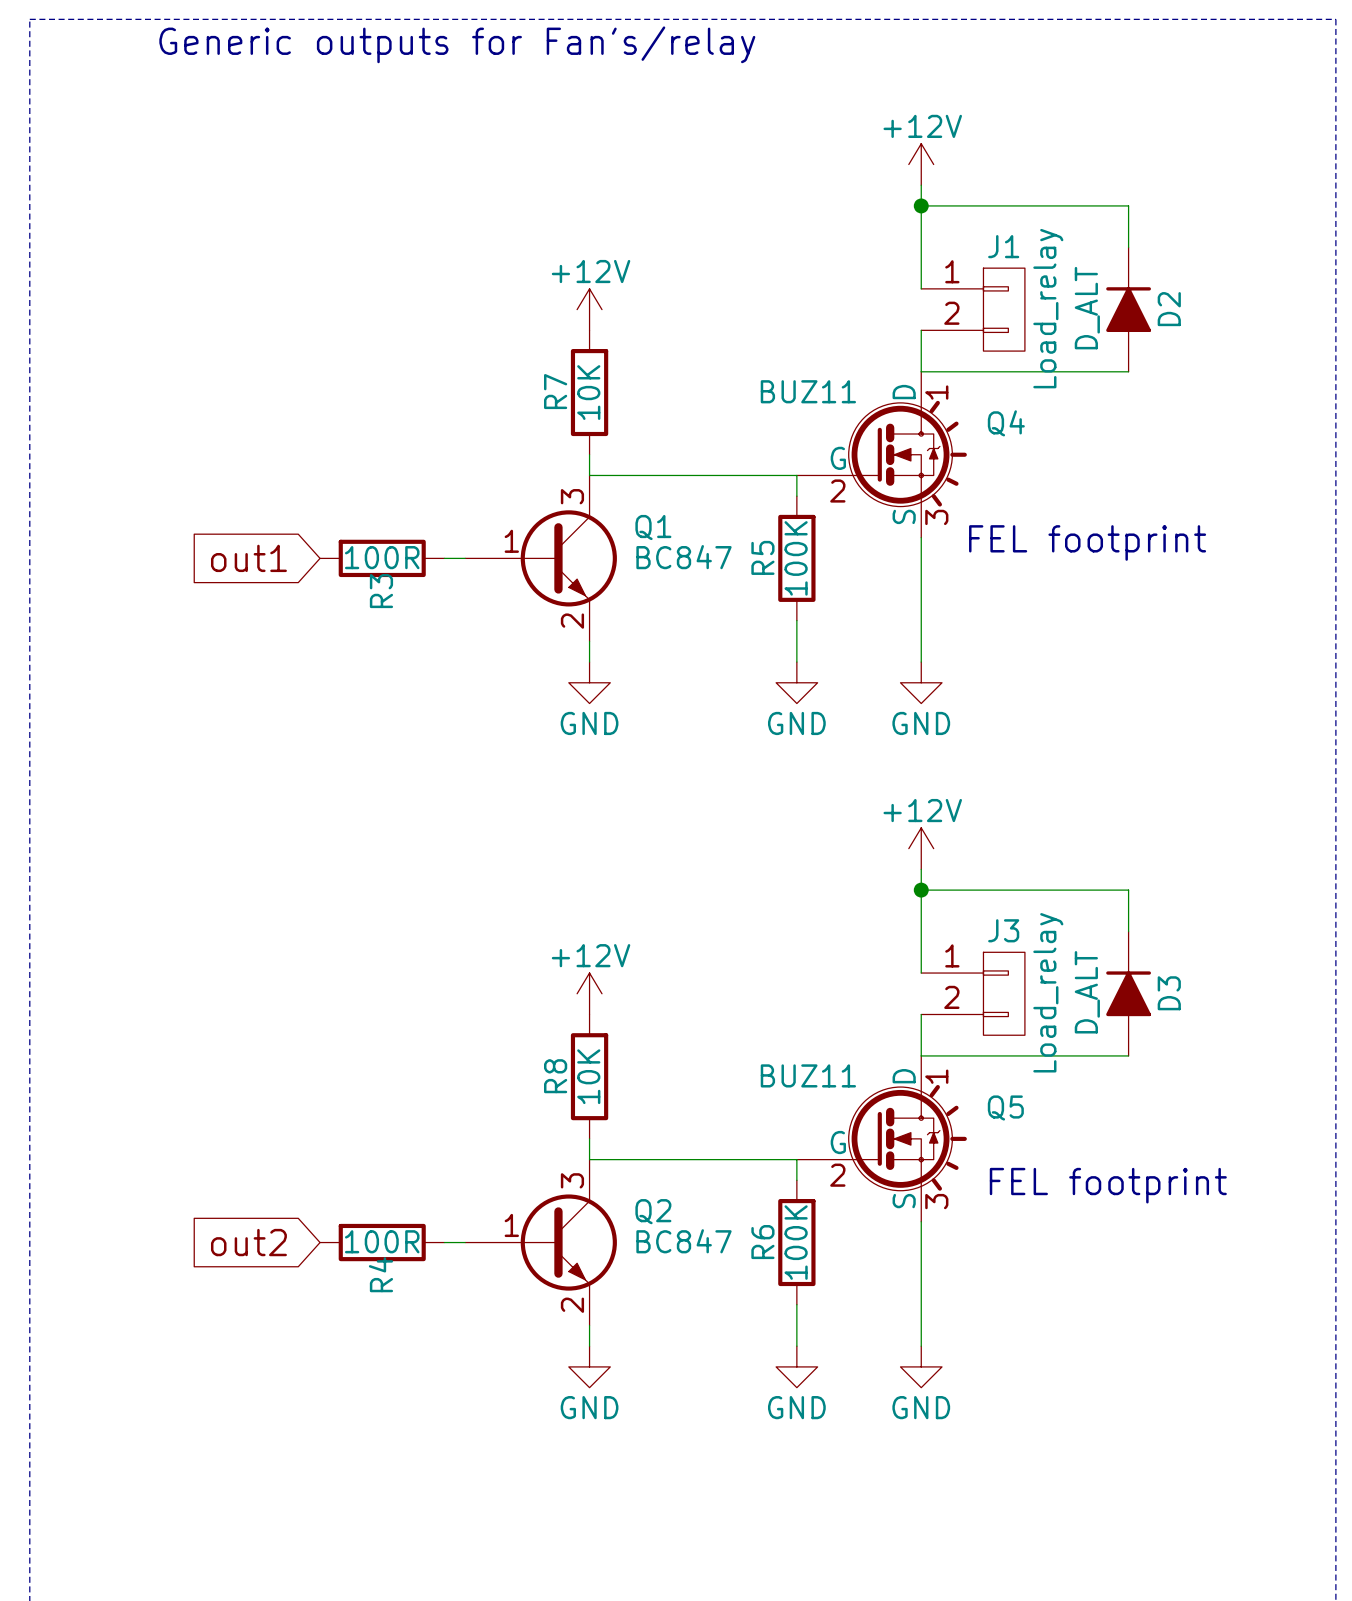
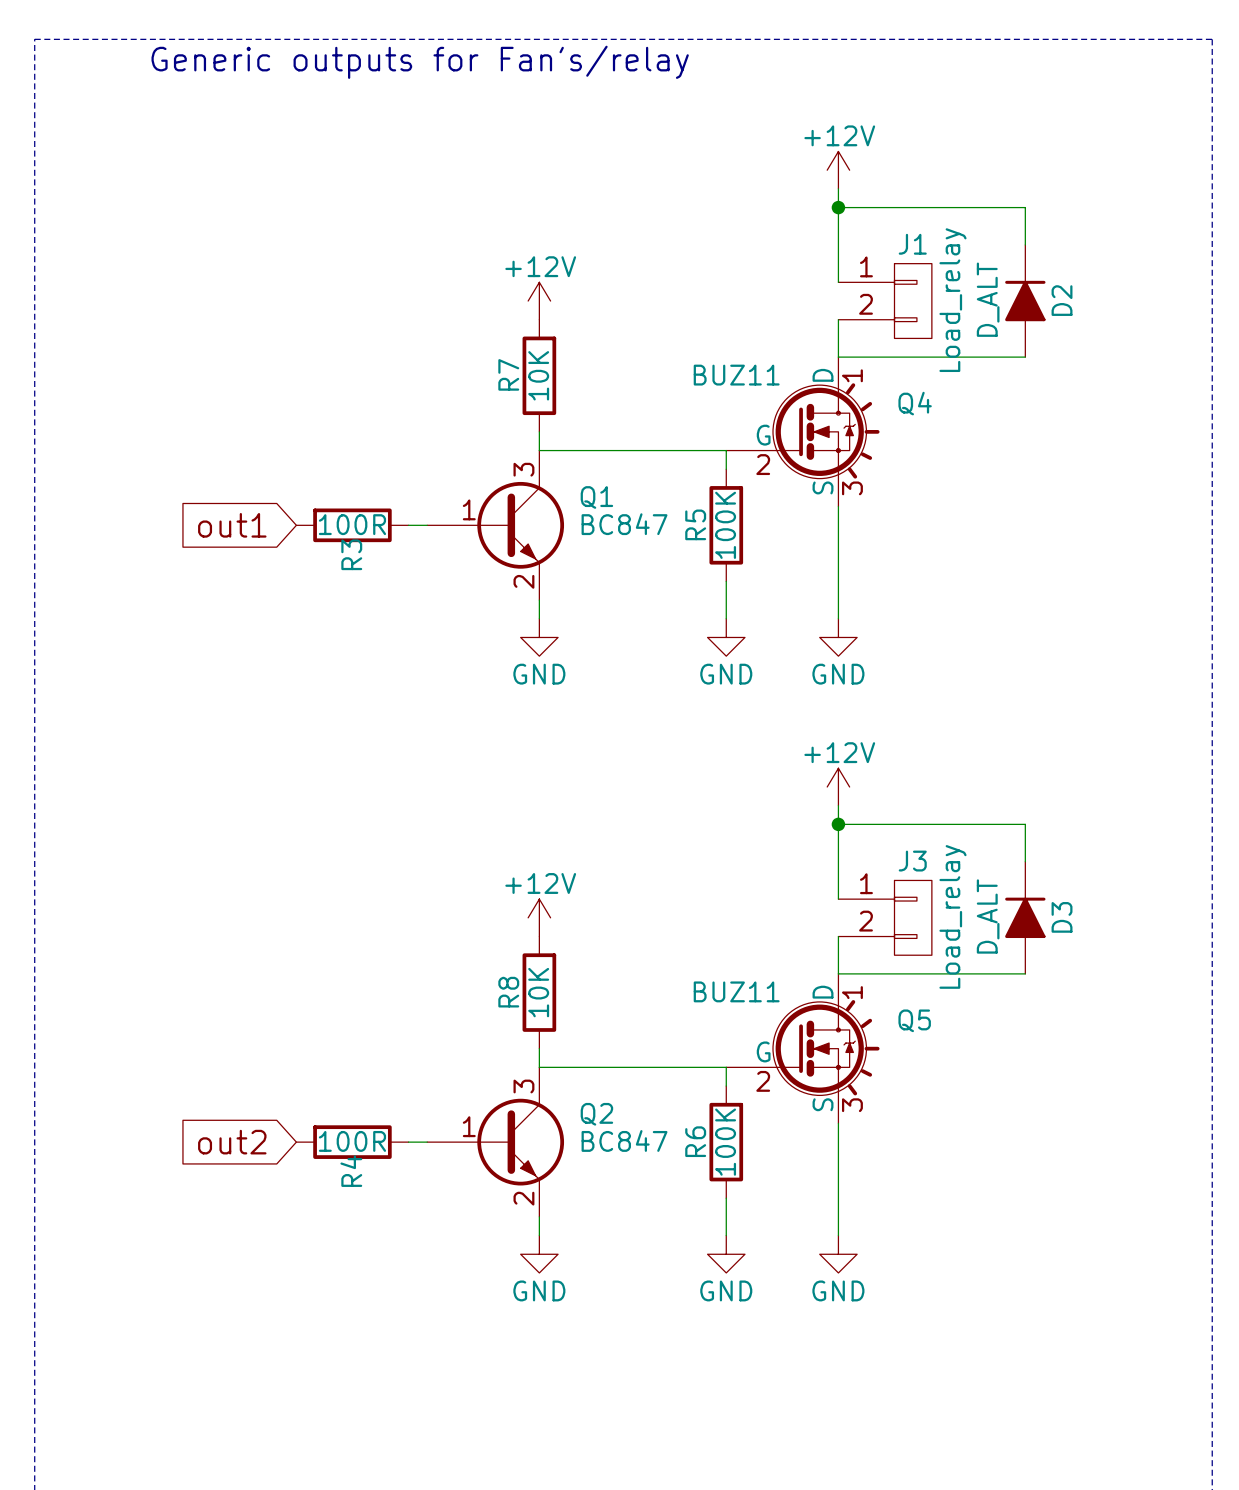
text: FEL footprint (1087, 542) -> none
text: FEL footprint (1108, 1185) -> none

